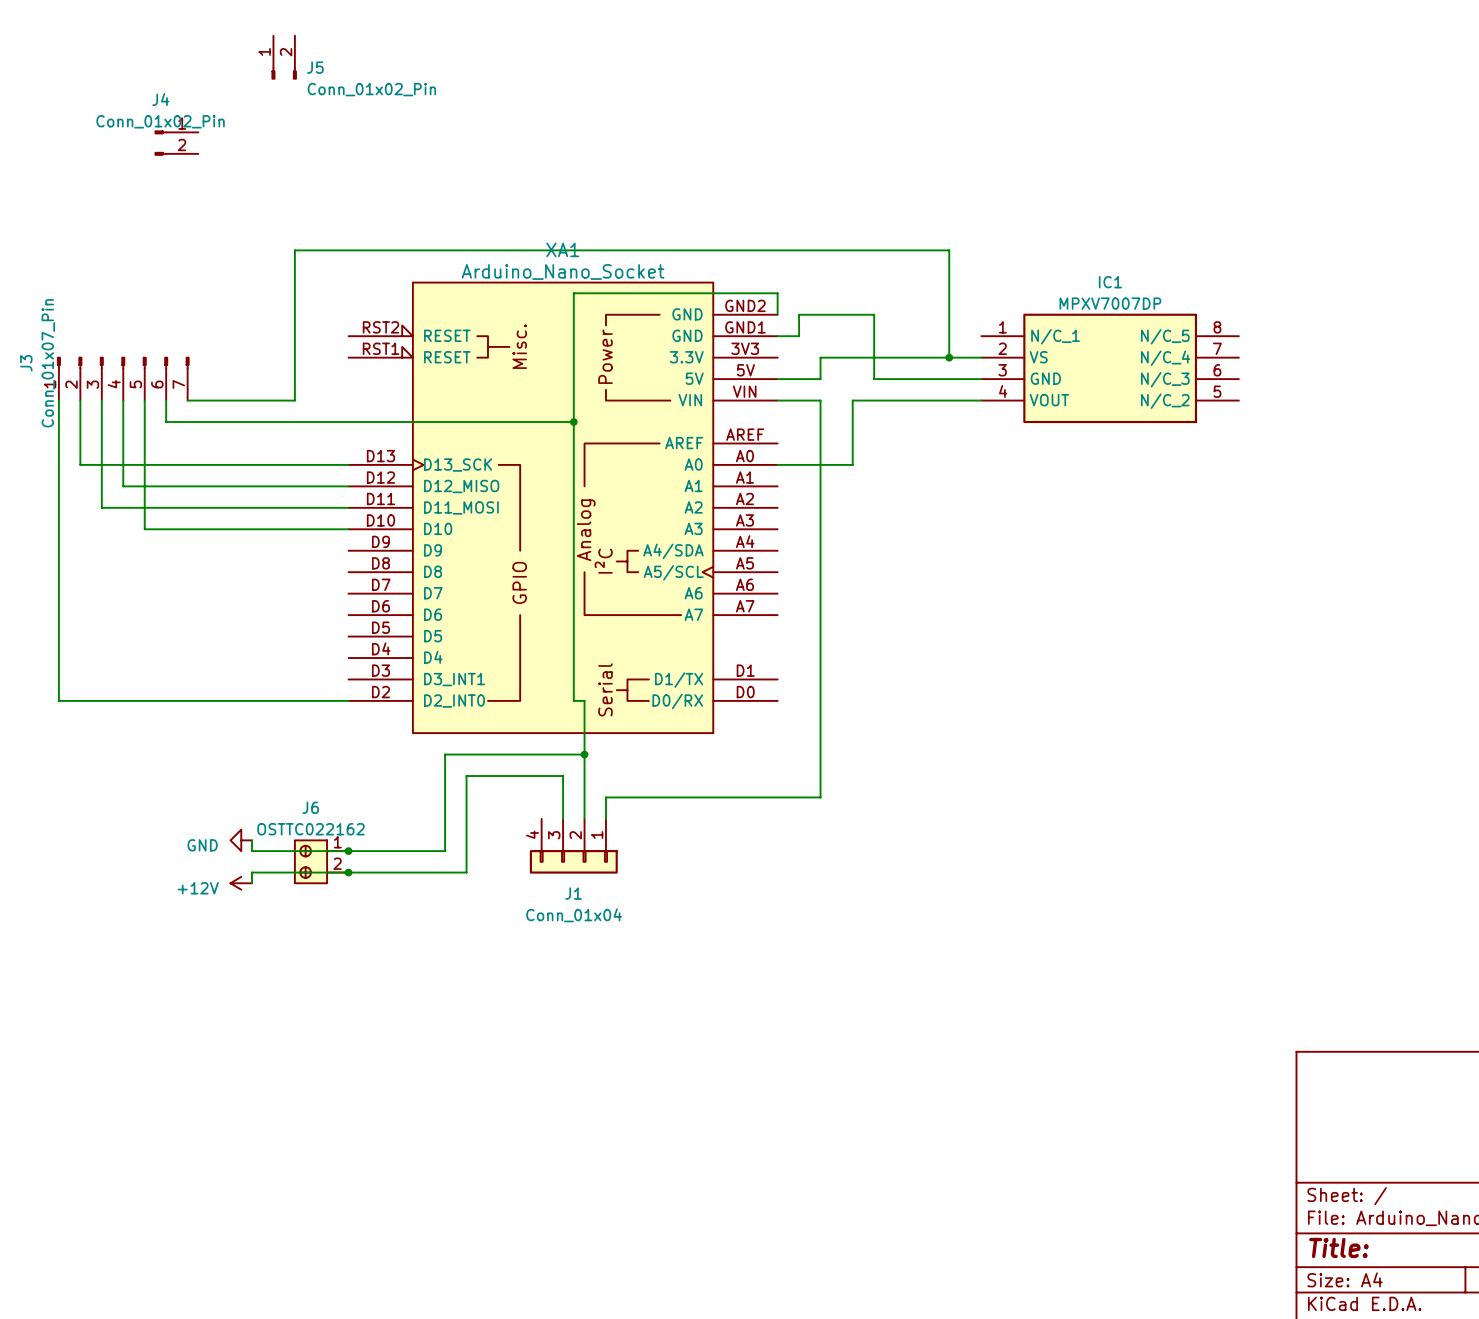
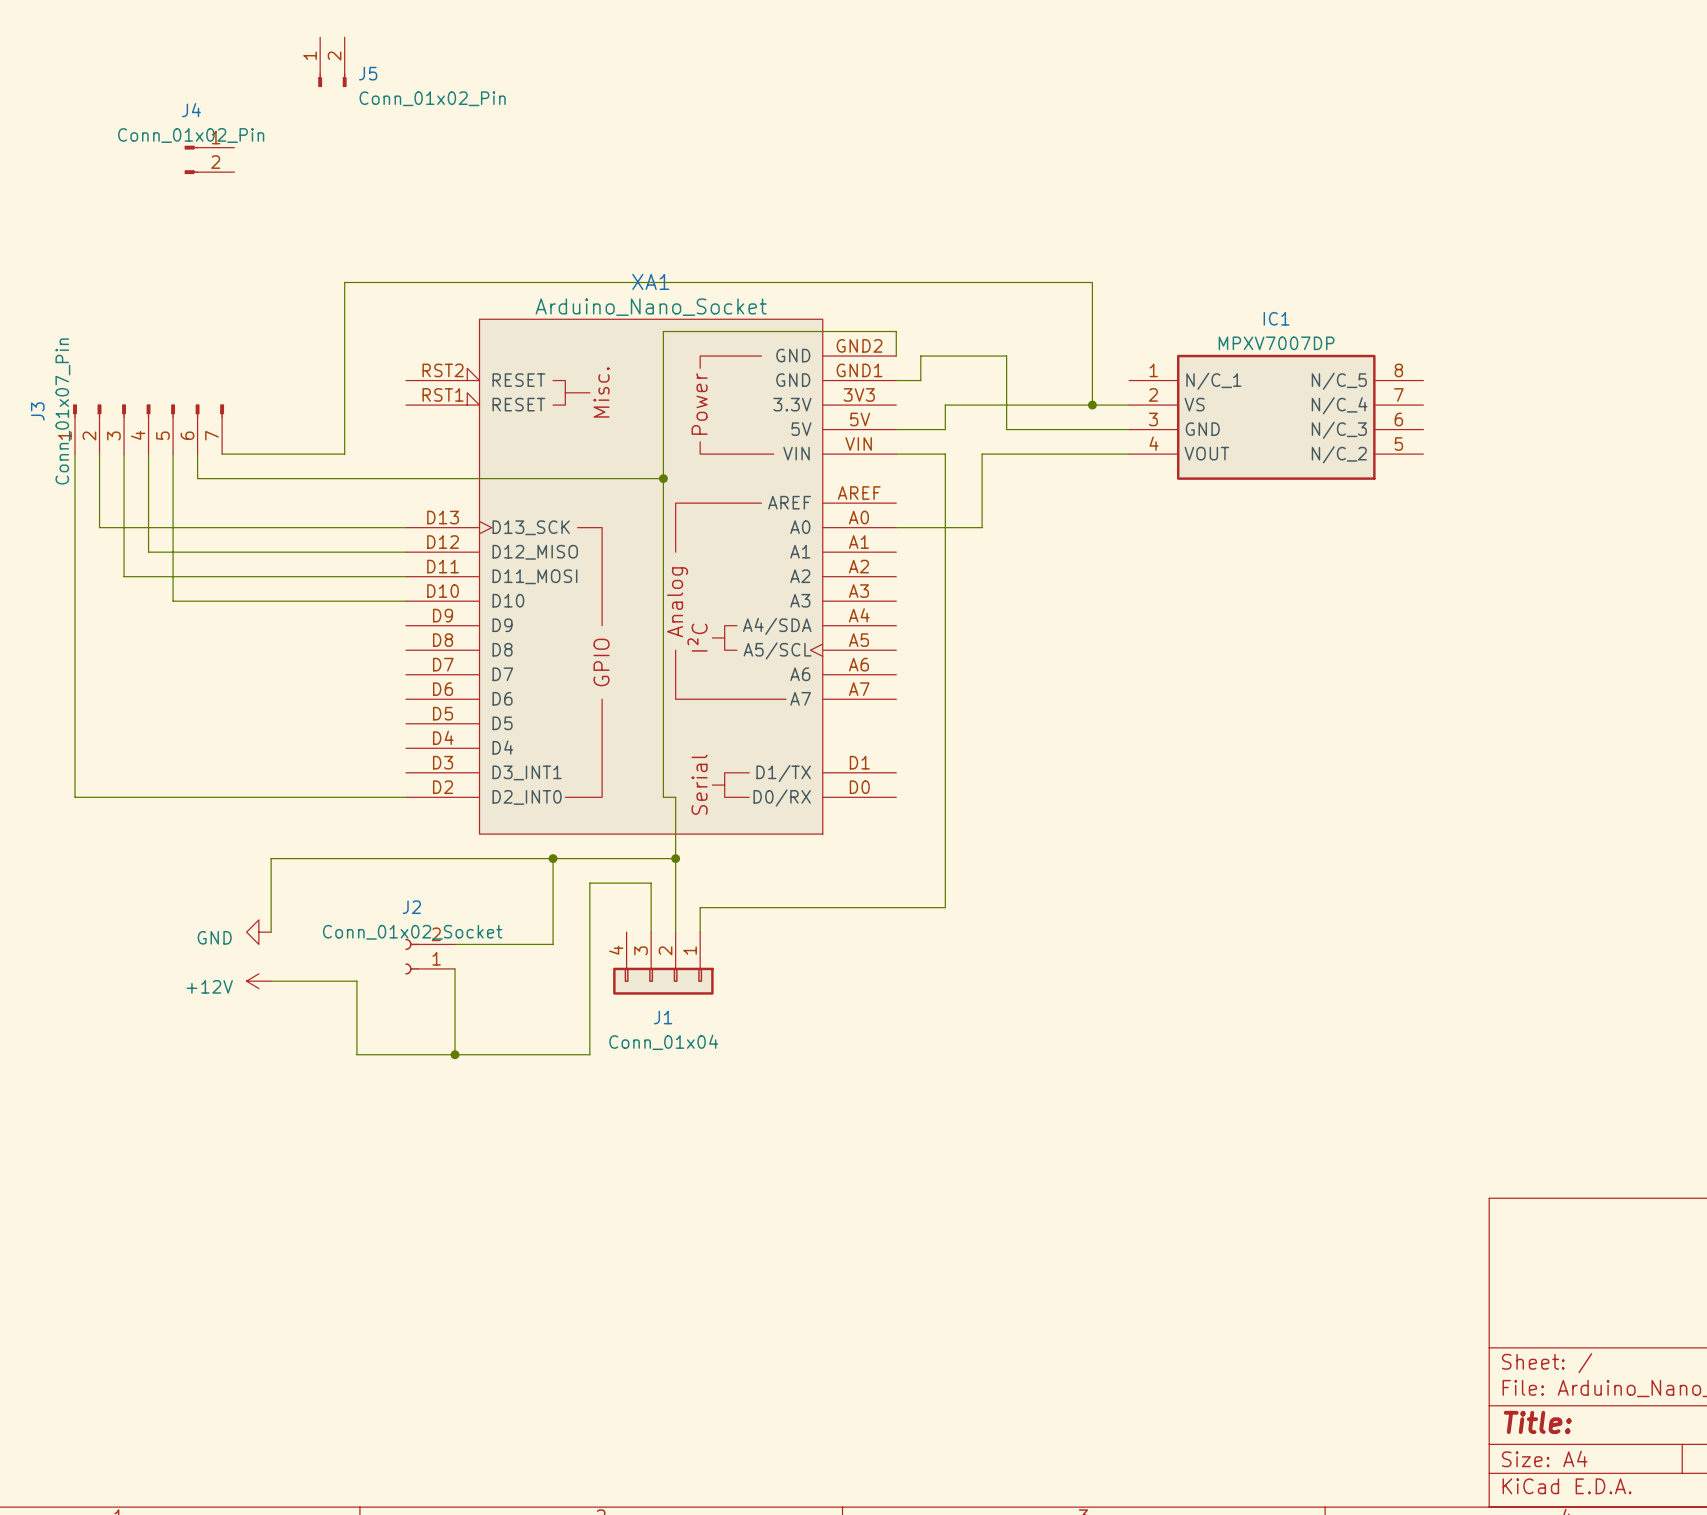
wire: (445, 754) (445, 851) (252, 851) (252, 840) -> (516, 858) (271, 858) (271, 932)
wire: none -> (553, 858) (553, 944) (455, 944)
junction: none -> (553, 858)
wire: (509, 776) (466, 776) (466, 872) (252, 872) (252, 883) -> (589, 883) (589, 1054) (356, 1054) (356, 981) (271, 981)
power symbol position: GND (241, 840) -> GND (258, 932)
J2: none -> Conn_01x02_Socket (430, 956)
junction: (348, 851) -> none
wire: none -> (455, 968) (455, 1054)
J6: OSTTC022162 (321, 861) -> none
junction: (348, 872) -> none
power symbol position: +12V (241, 883) -> +12V (258, 981)
junction: none -> (455, 1054)

